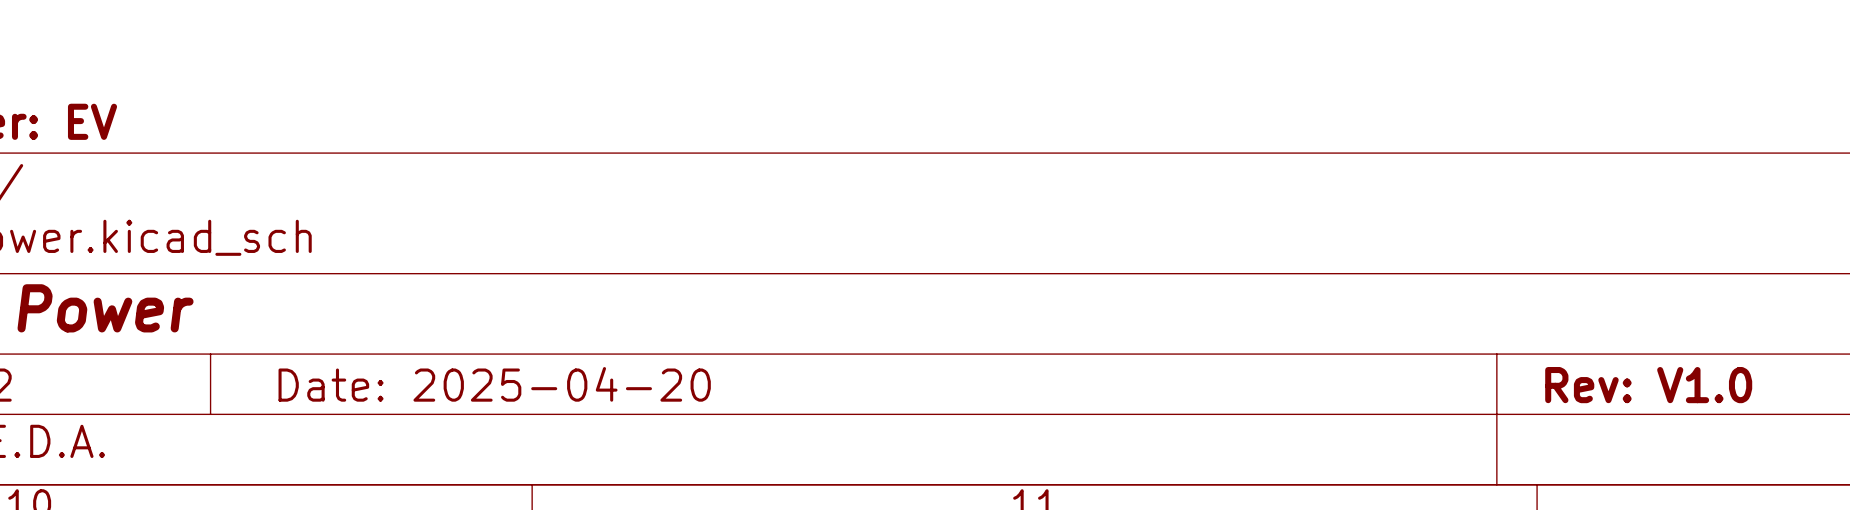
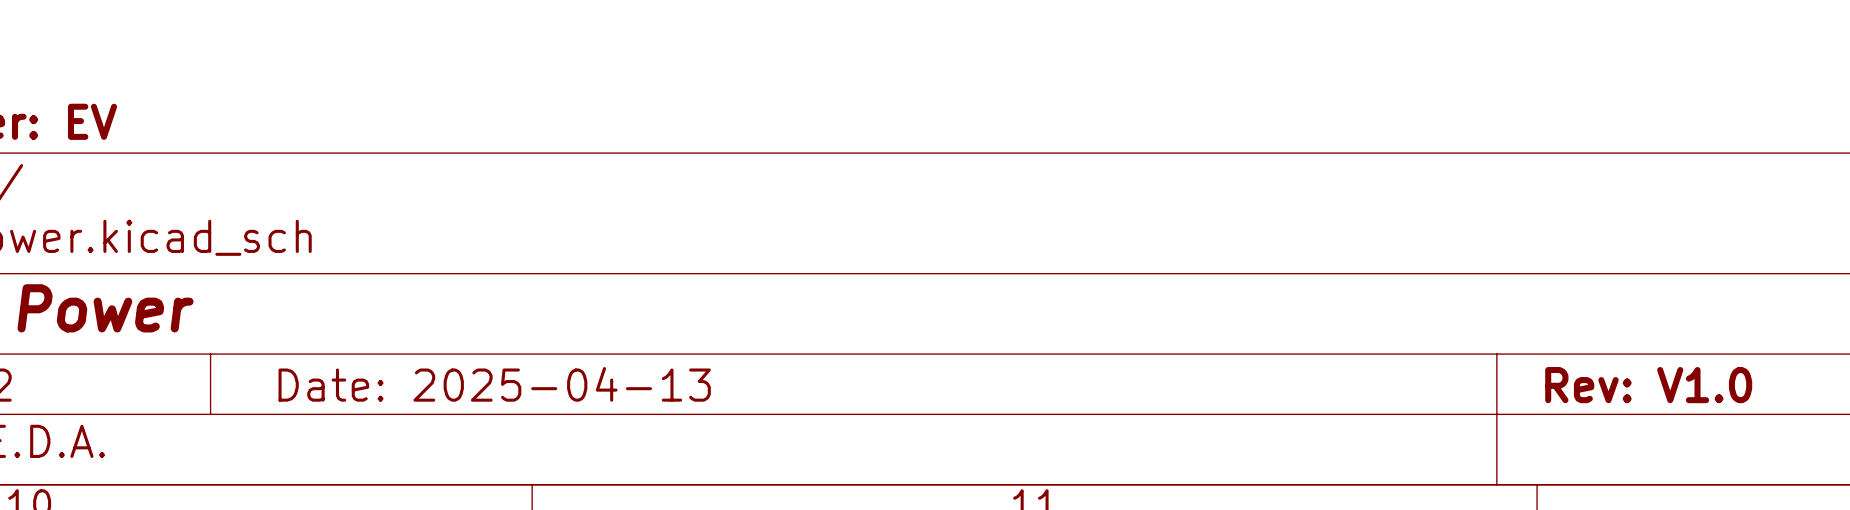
title block: Date: 2025-04-20 (494, 384) -> Date: 2025-04-13 (494, 384)

